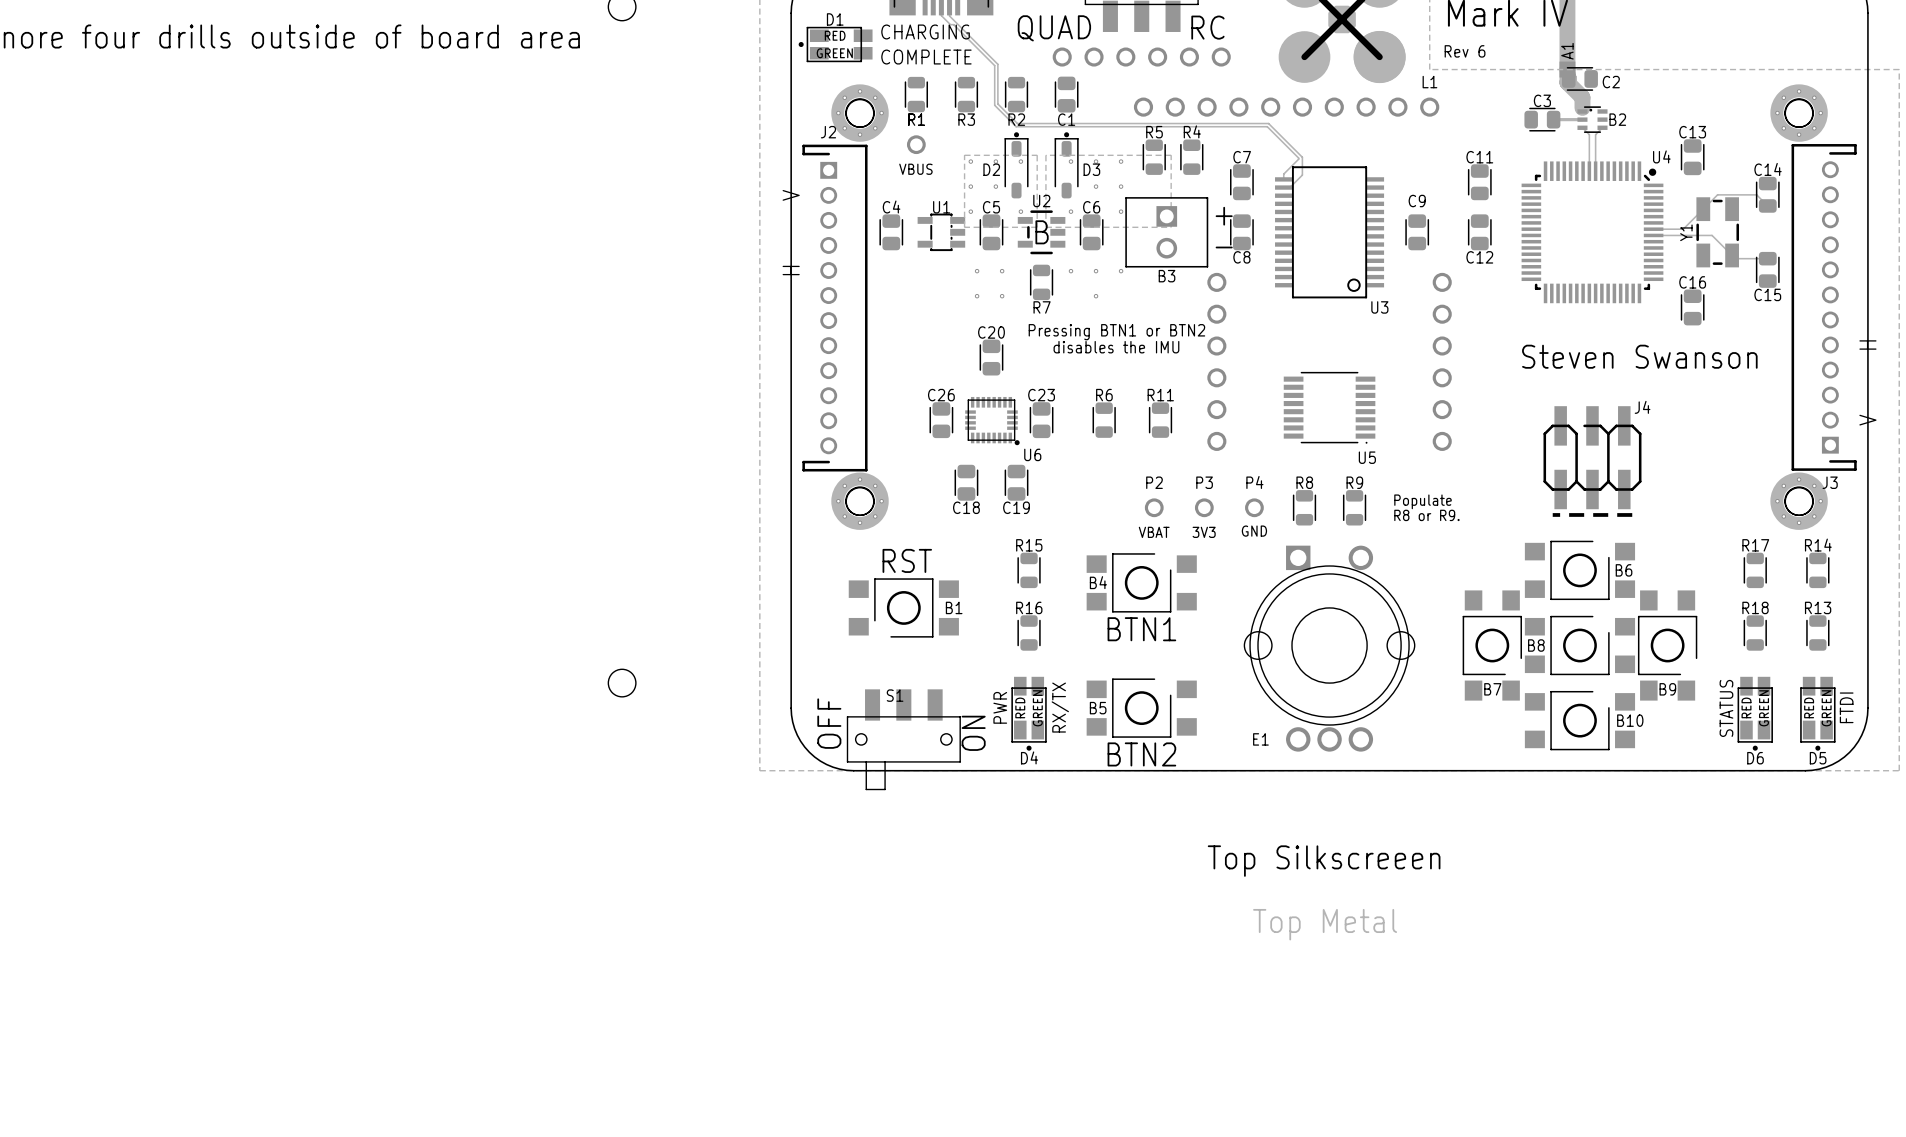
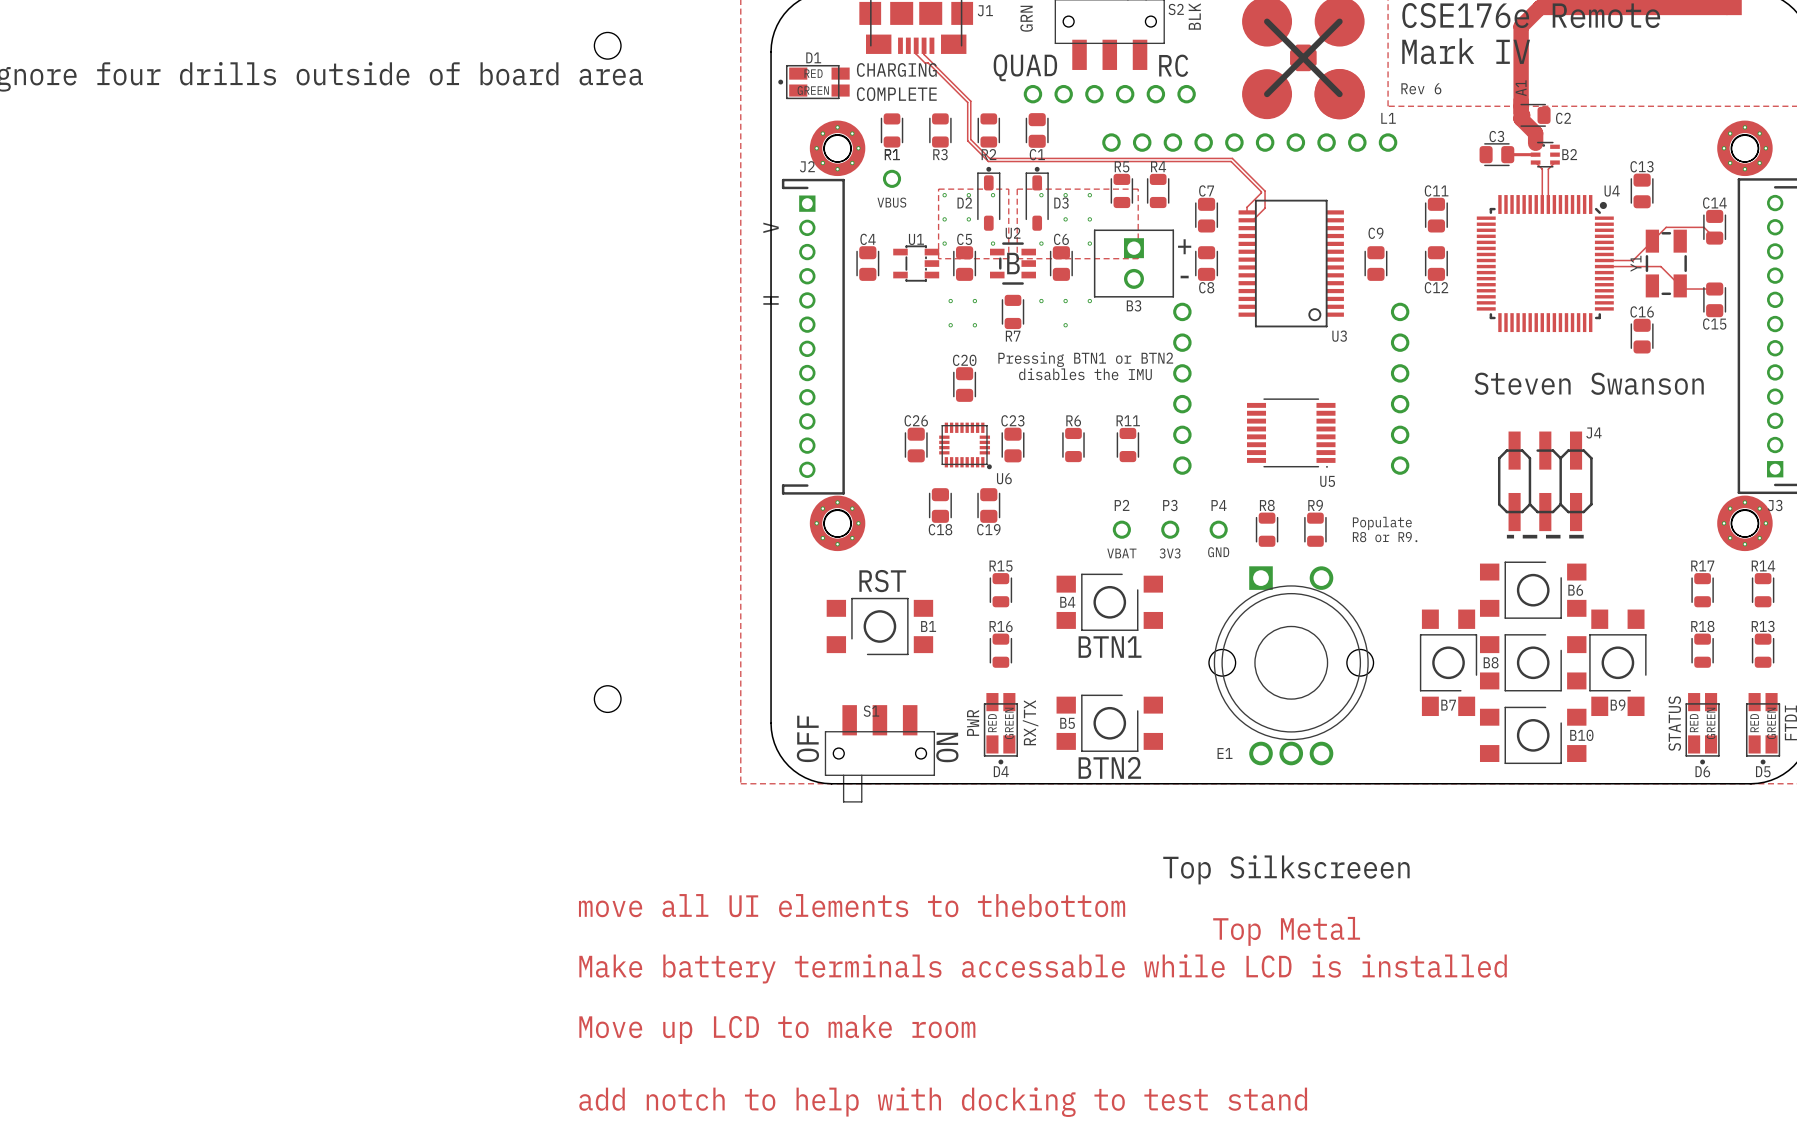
text: none -> move all UI elements to thebottom (852, 905)
text: none -> Make battery terminals accessable while LCD is installed (1043, 968)
text: none -> Move up LCD to make room (777, 1029)
text: none -> add notch to help with docking to test stand (943, 1102)

